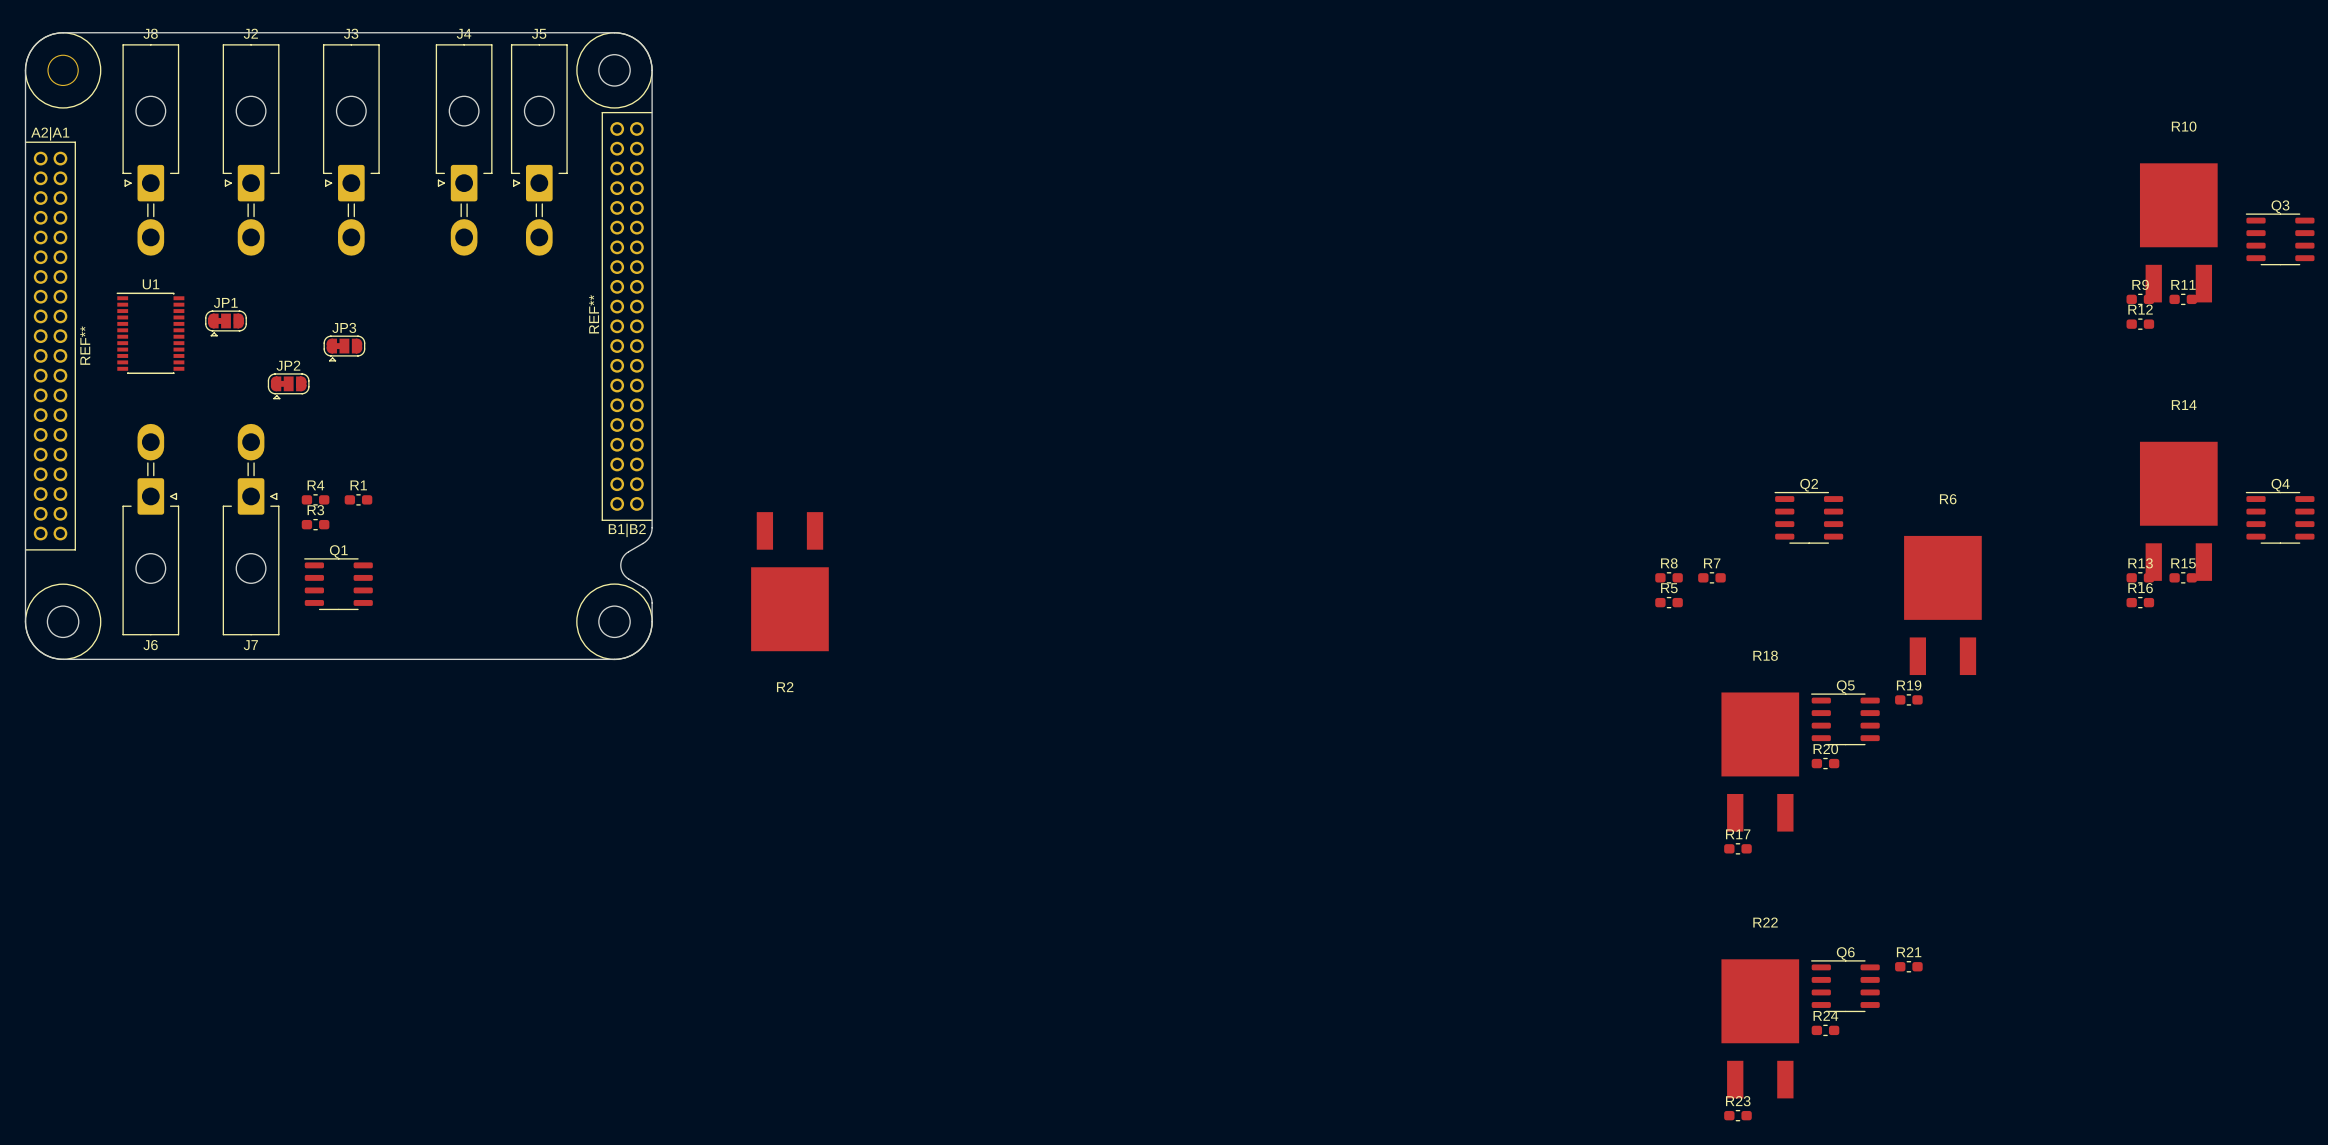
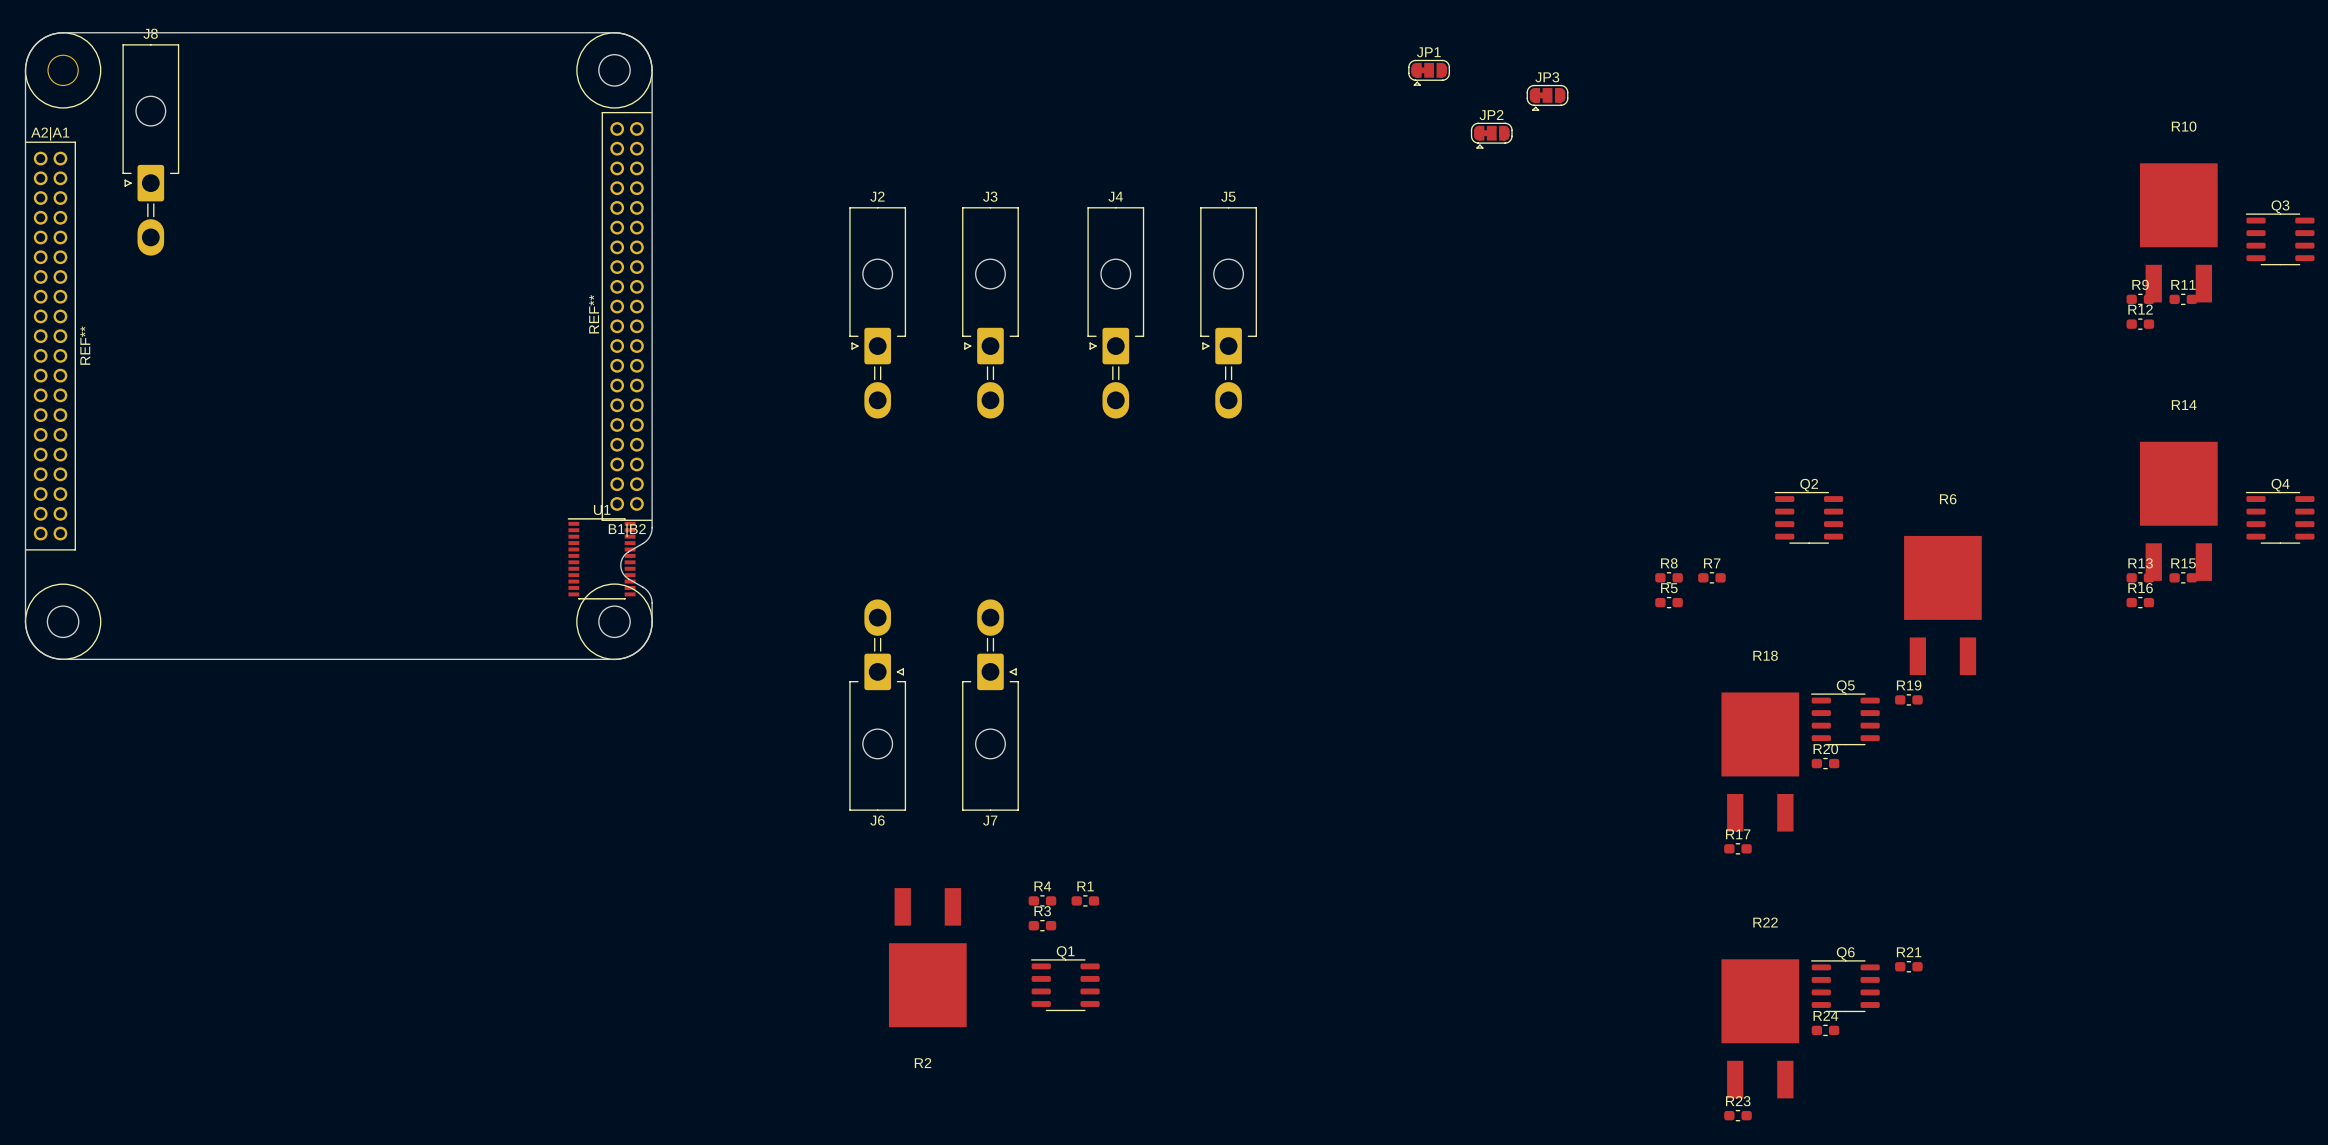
J2 position: (251, 149) -> (877, 312)
J3 position: (351, 149) -> (990, 312)
J4 position: (464, 149) -> (1115, 312)
J5 position: (539, 149) -> (1228, 312)
JP1 position: (226, 323) -> (1429, 72)
U1 position: (150, 333) -> (601, 558)
JP3 position: (344, 348) -> (1547, 97)
JP2 position: (288, 386) -> (1491, 135)
R4 position: (315, 499) -> (1042, 900)
R1 position: (358, 499) -> (1085, 900)
R3 position: (315, 524) -> (1042, 925)
J6 position: (150, 529) -> (877, 705)
J7 position: (251, 529) -> (990, 705)
R2 position: (789, 581) -> (927, 957)
Q1 position: (338, 584) -> (1065, 985)

